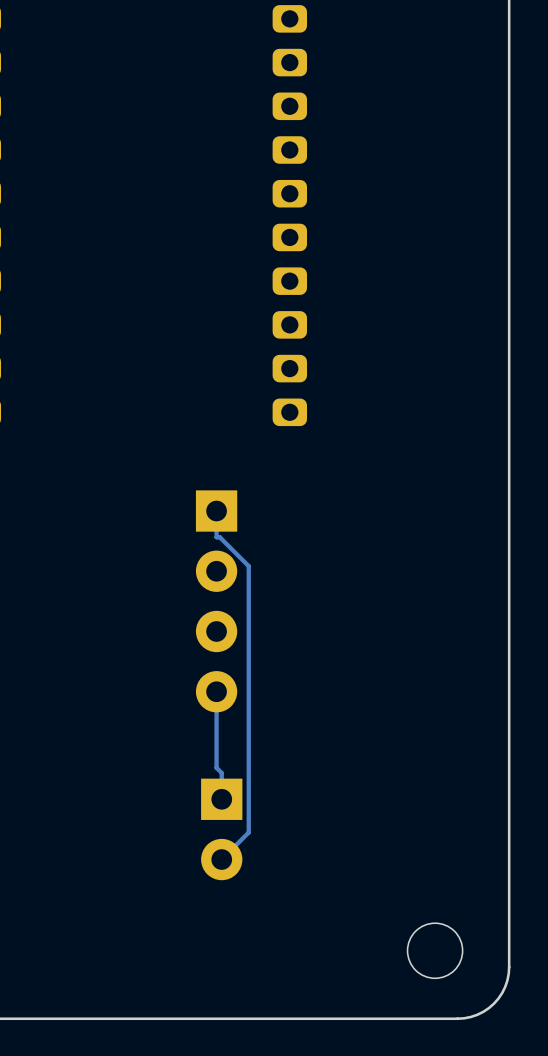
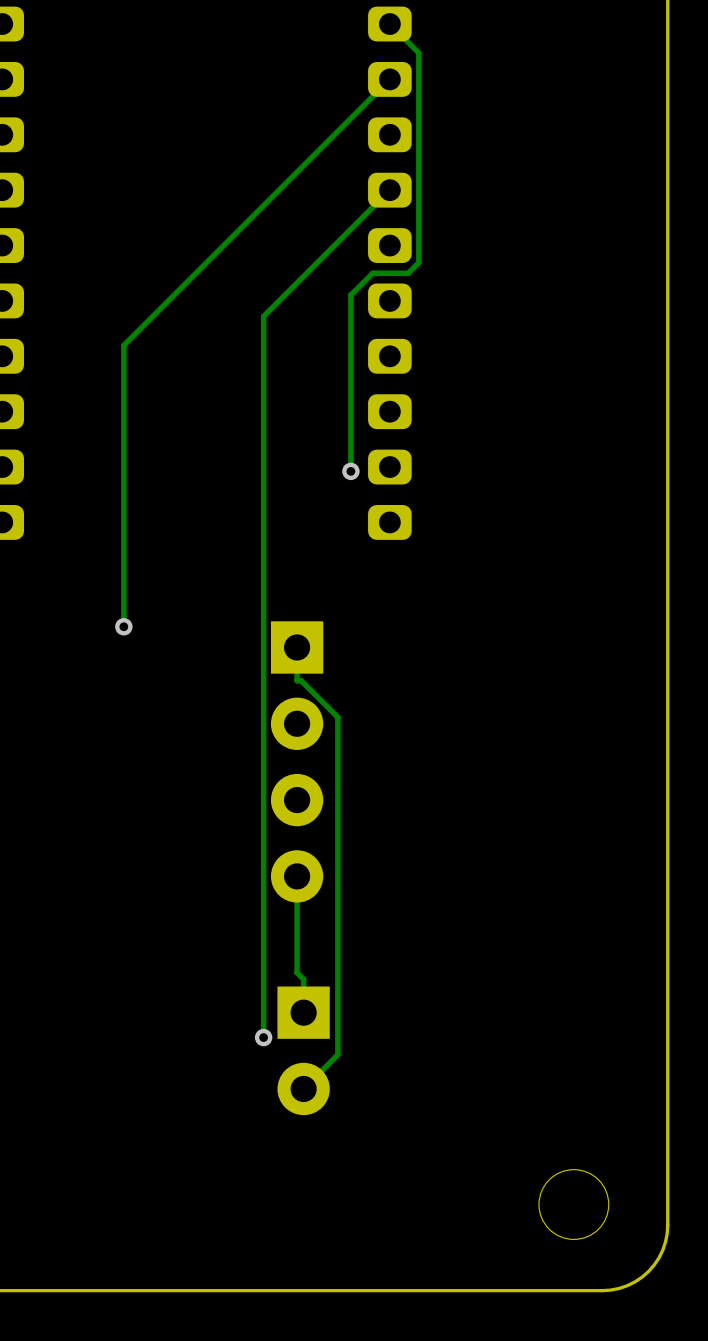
track: none -> (389, 24) (418, 53) (418, 262) (408, 273) (372, 273) (350, 295) (350, 471)
track: none -> (389, 79) (123, 345) (123, 626)
track: none -> (389, 190) (263, 316) (263, 1037)
via: none -> (350, 471)
via: none -> (123, 626)
via: none -> (263, 1037)

